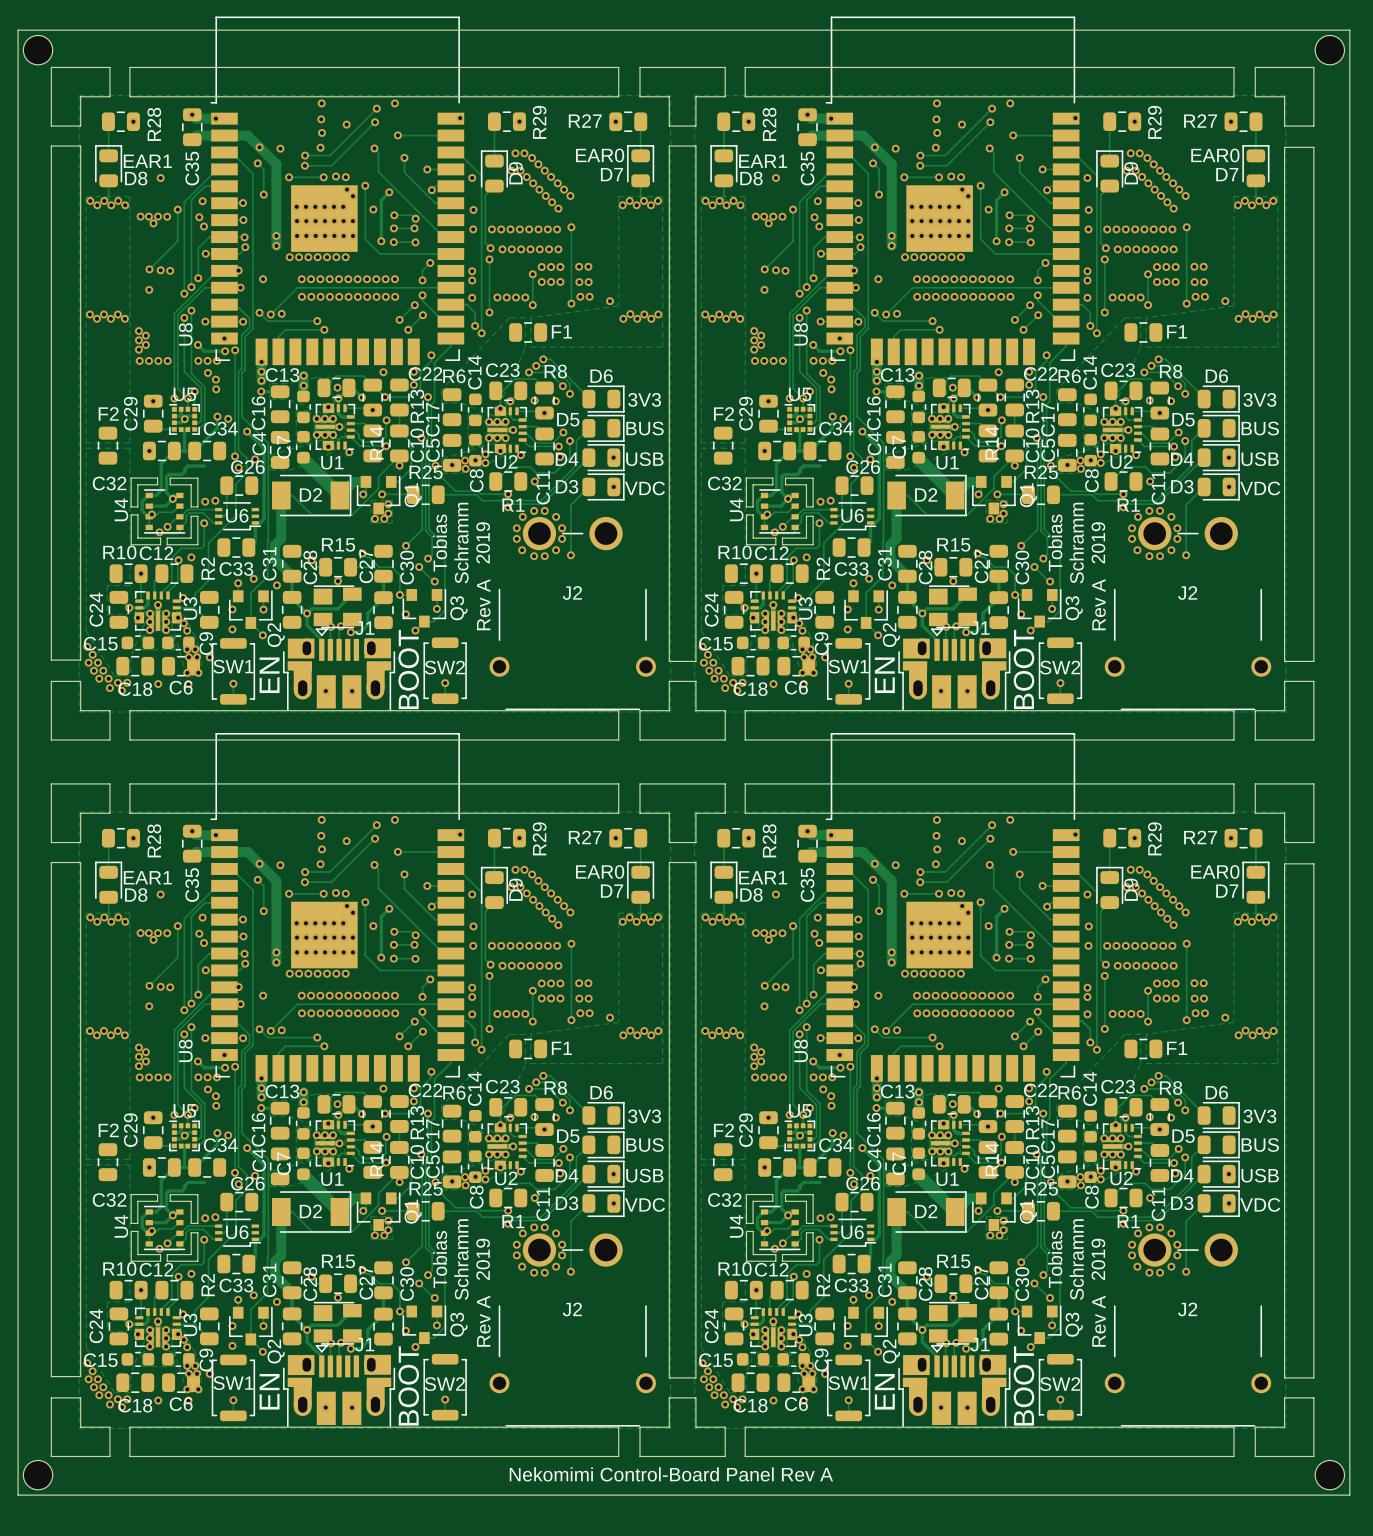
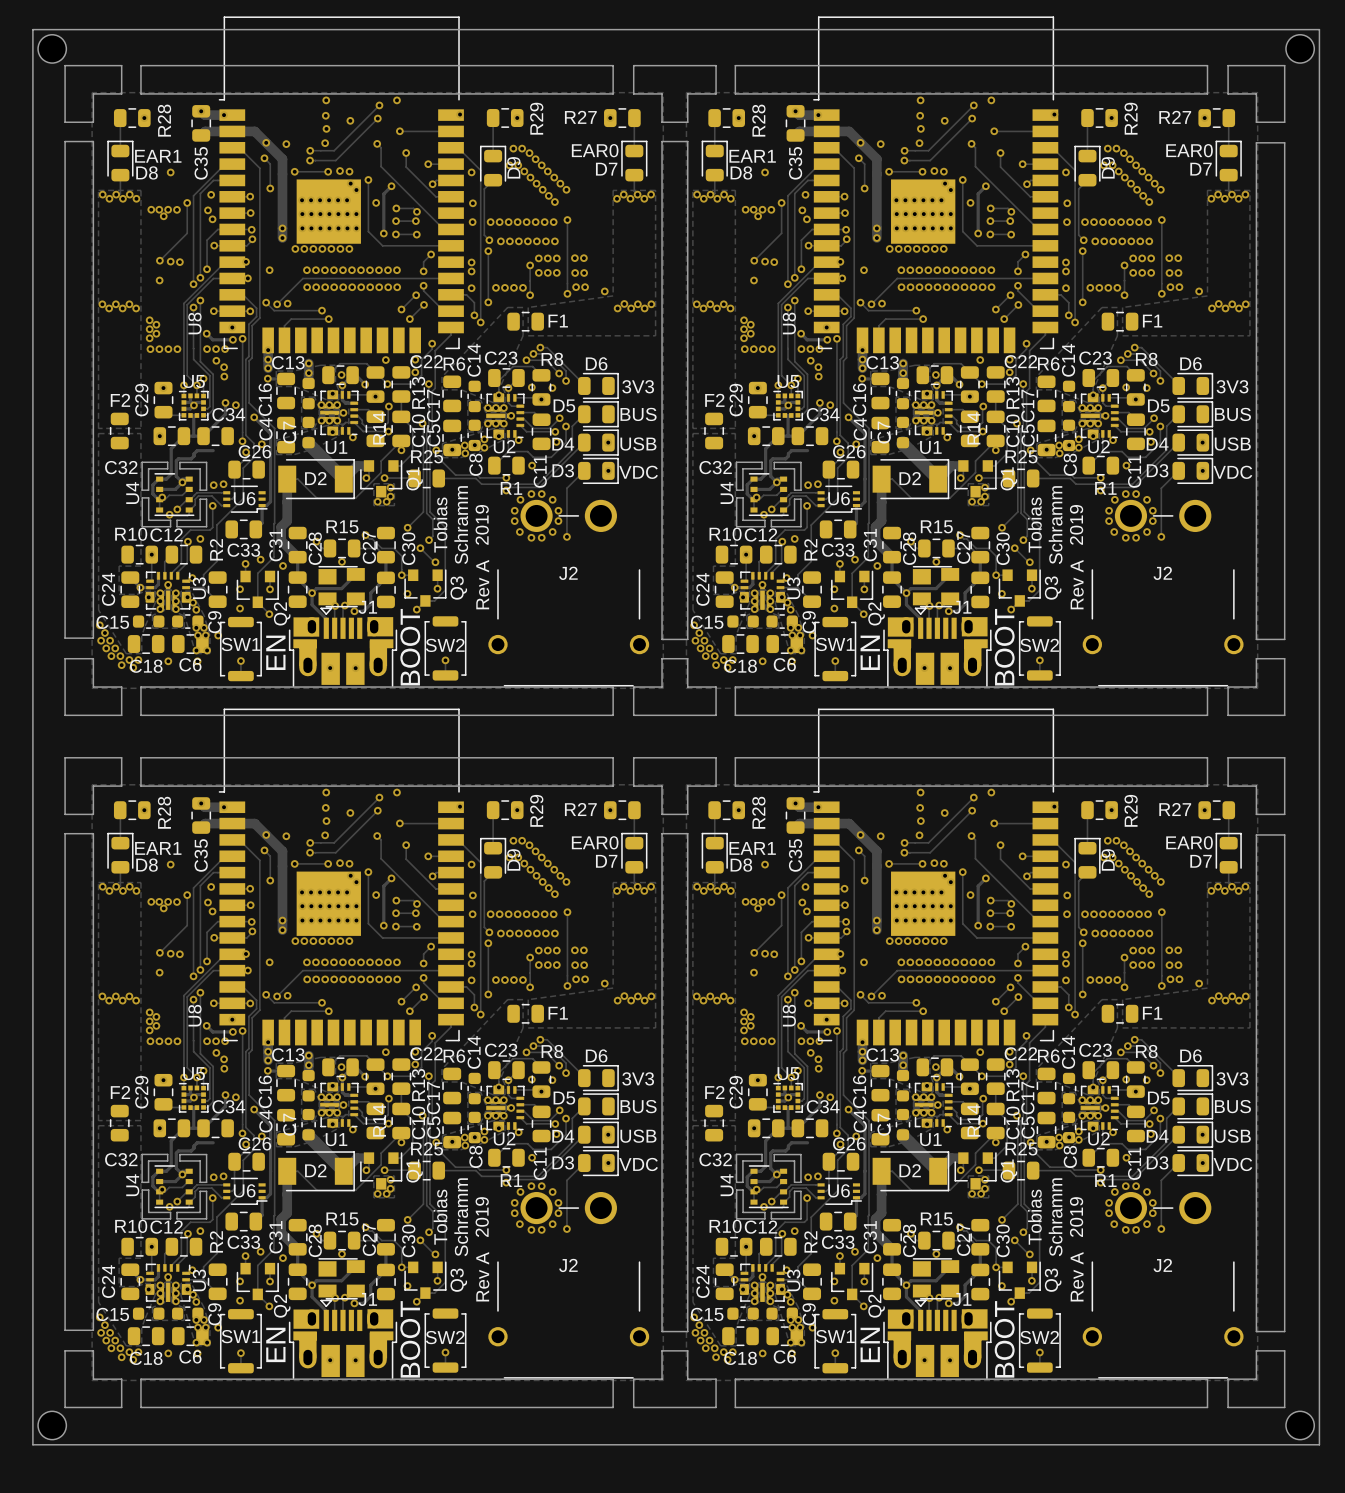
text: Nekomimi Control-Board Panel Rev A (671, 1474) -> none

